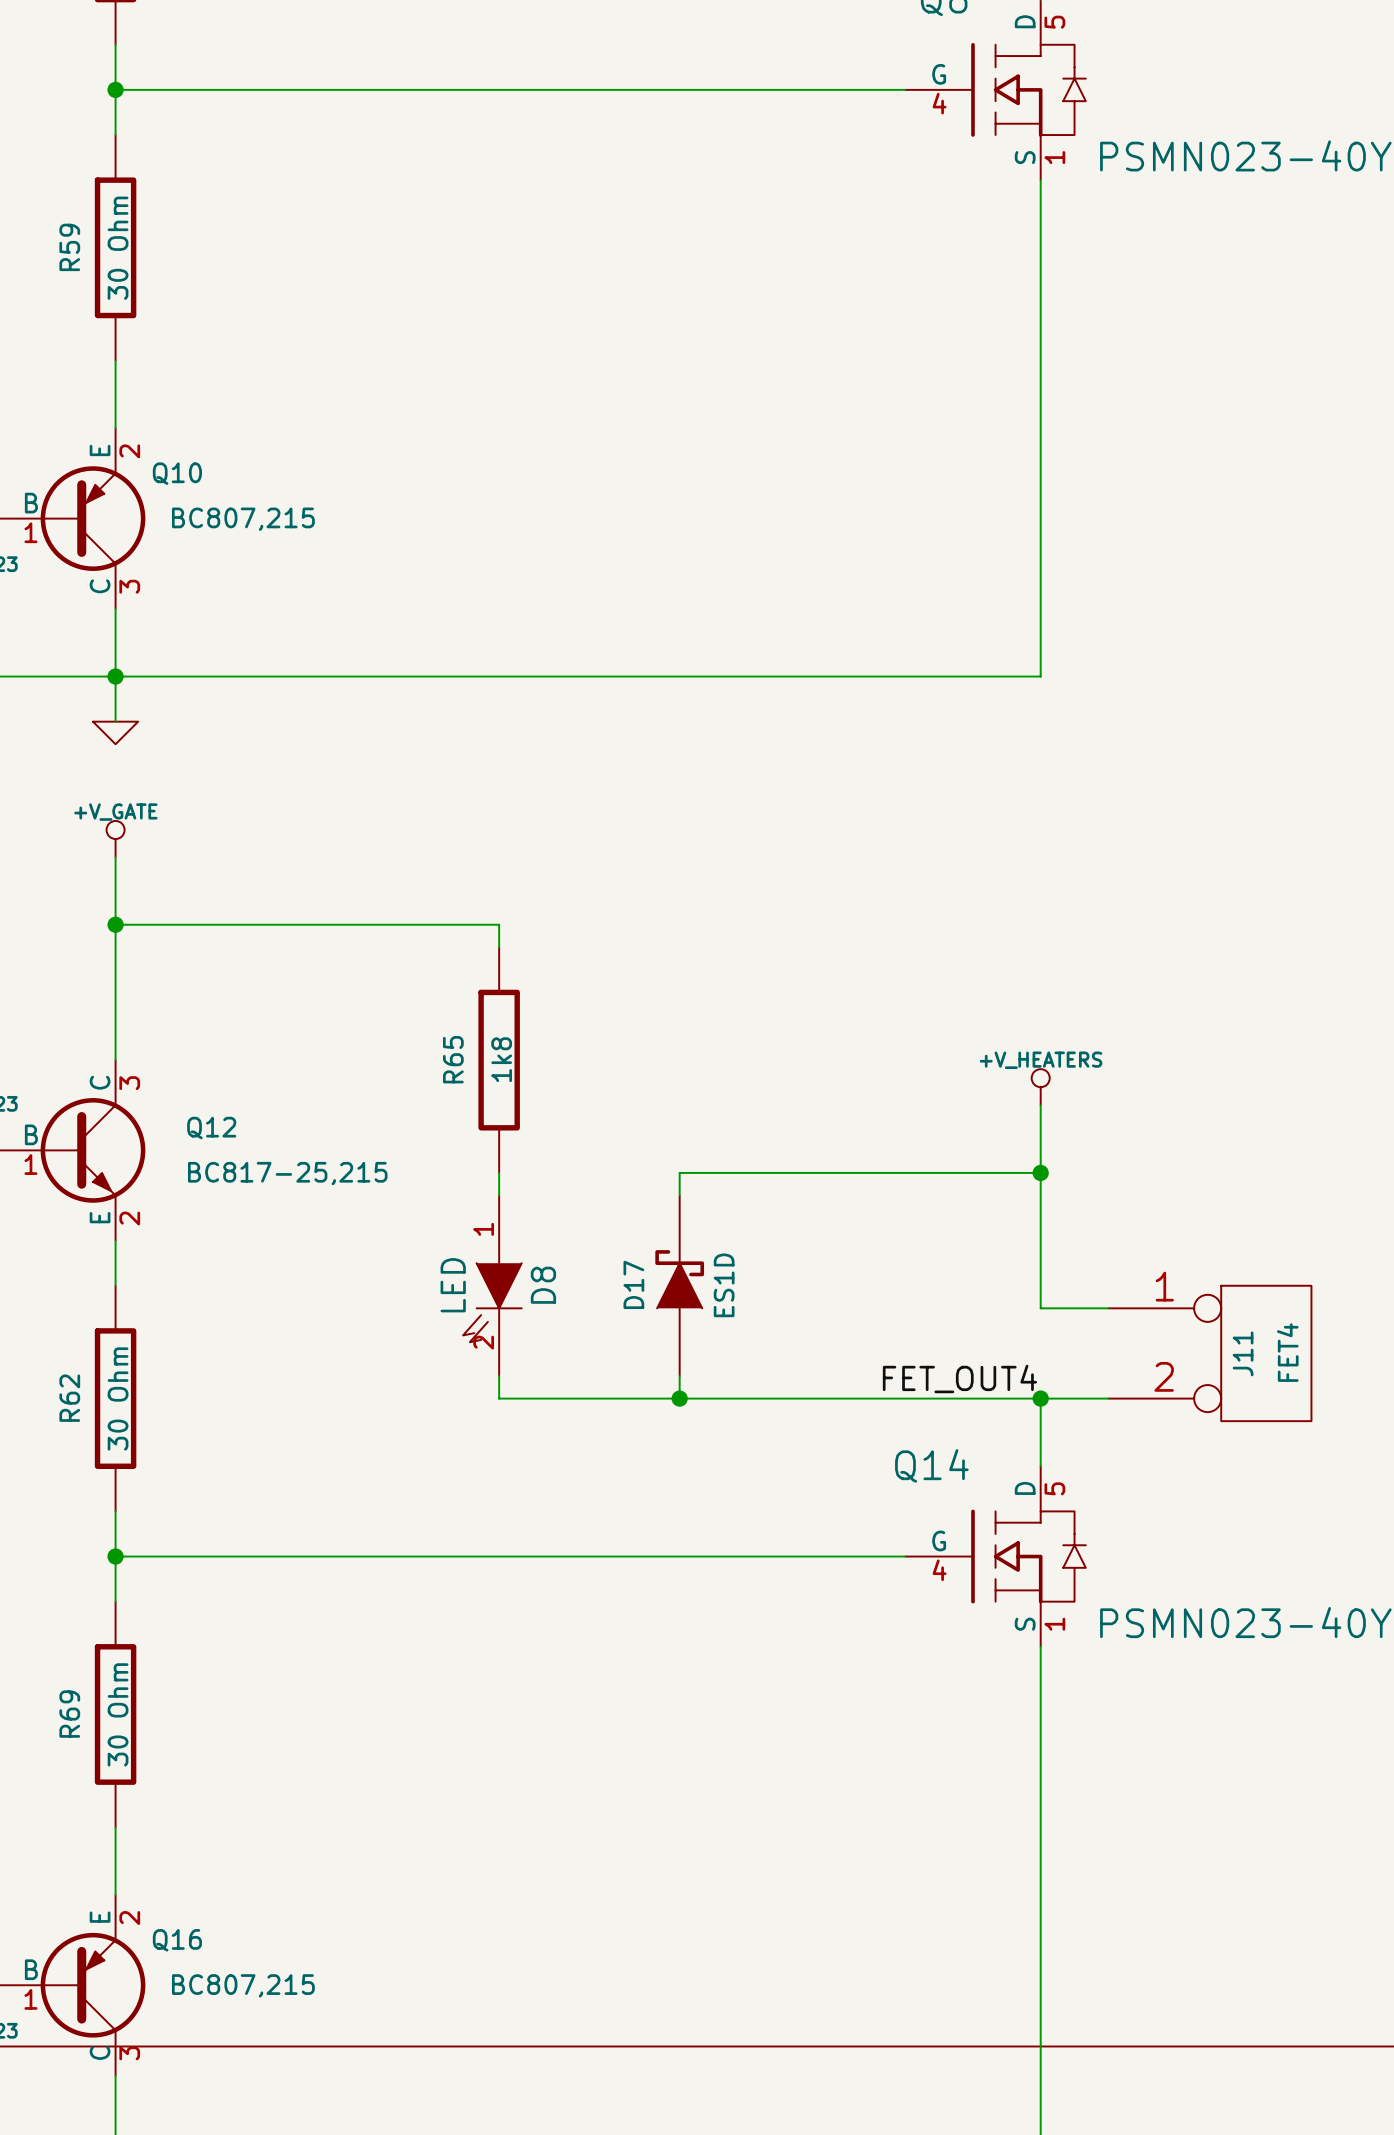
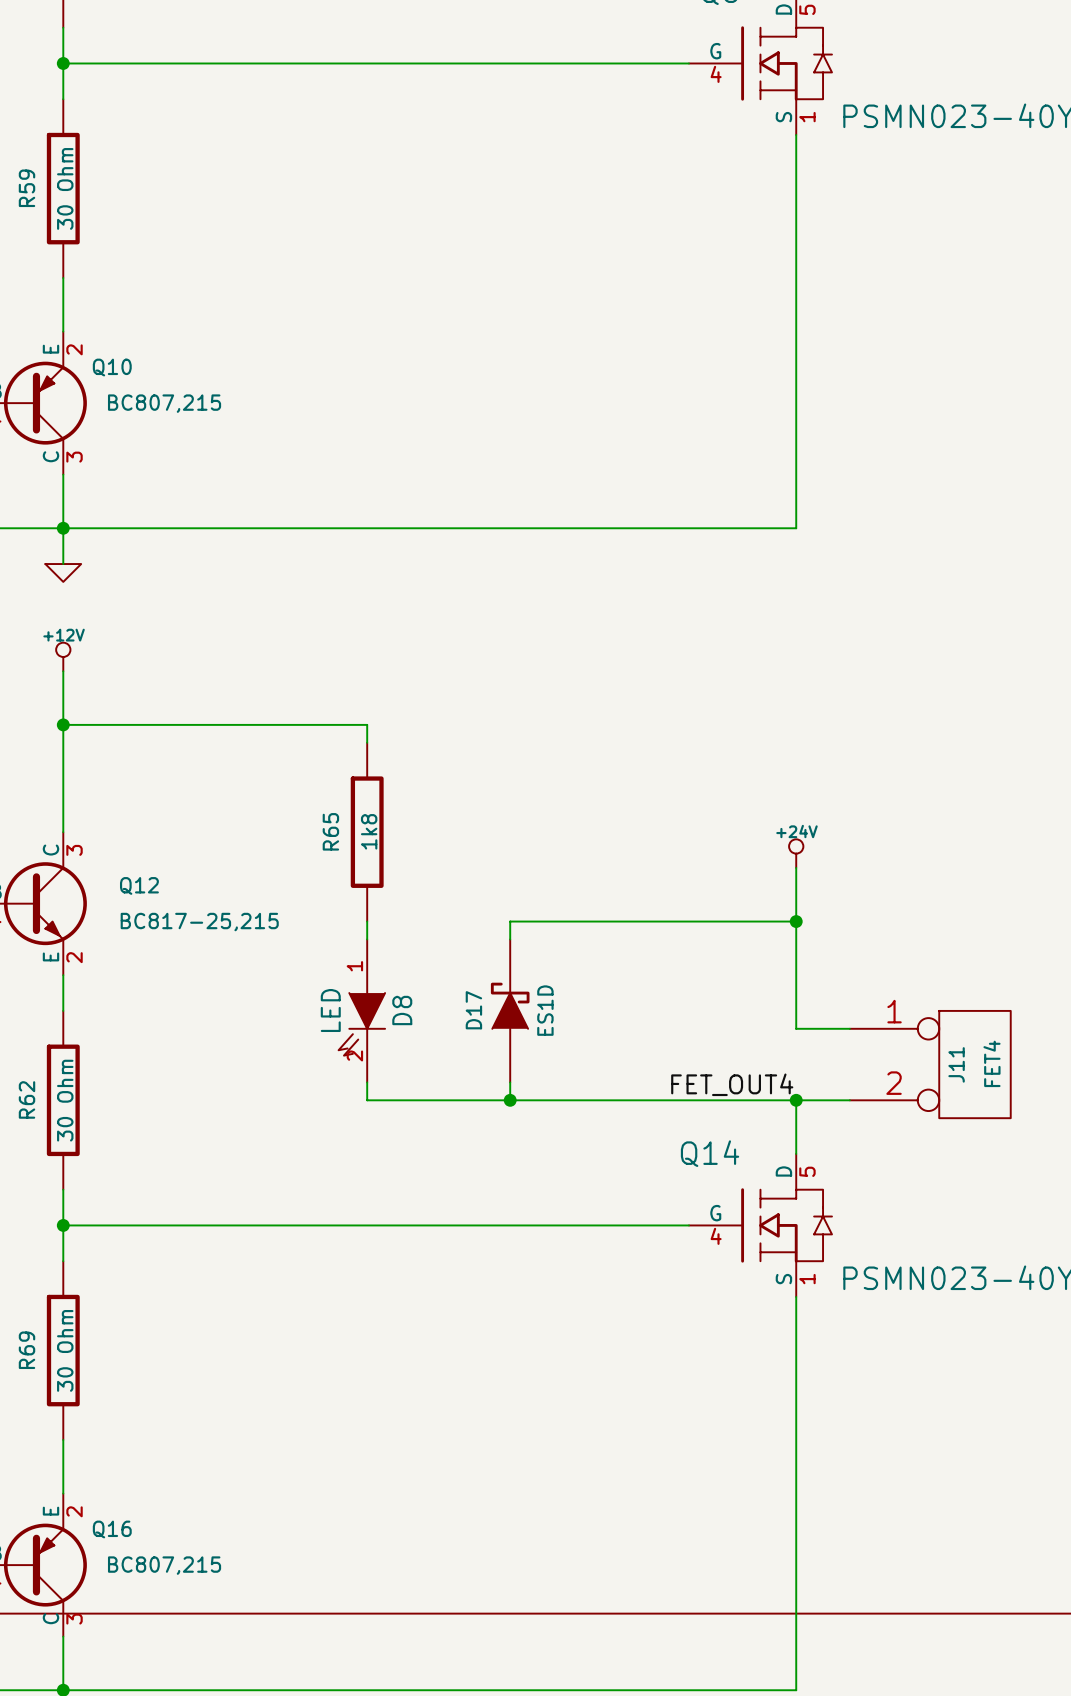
power symbol: +V_GATE (115, 839) -> +12V (63, 656)
power symbol: +V_HEATERS (1040, 1087) -> +24V (796, 853)

